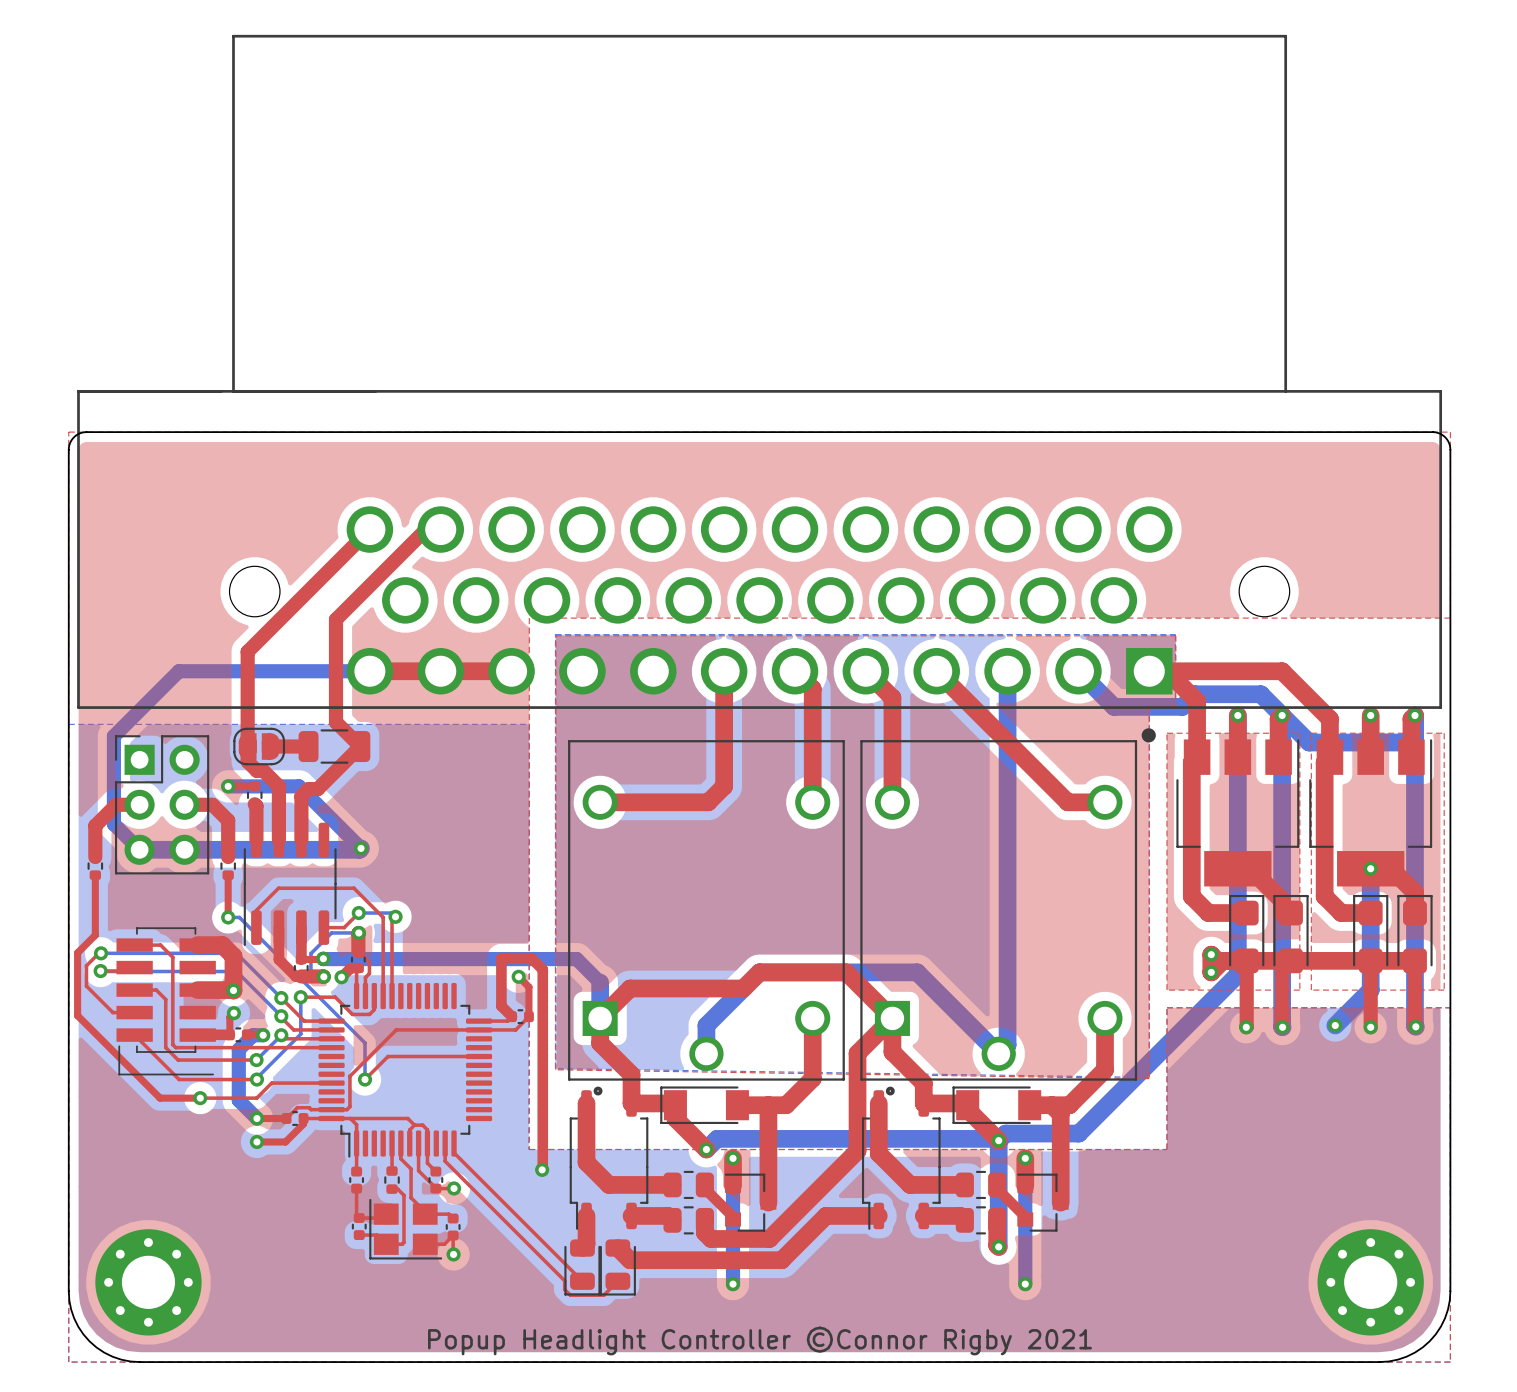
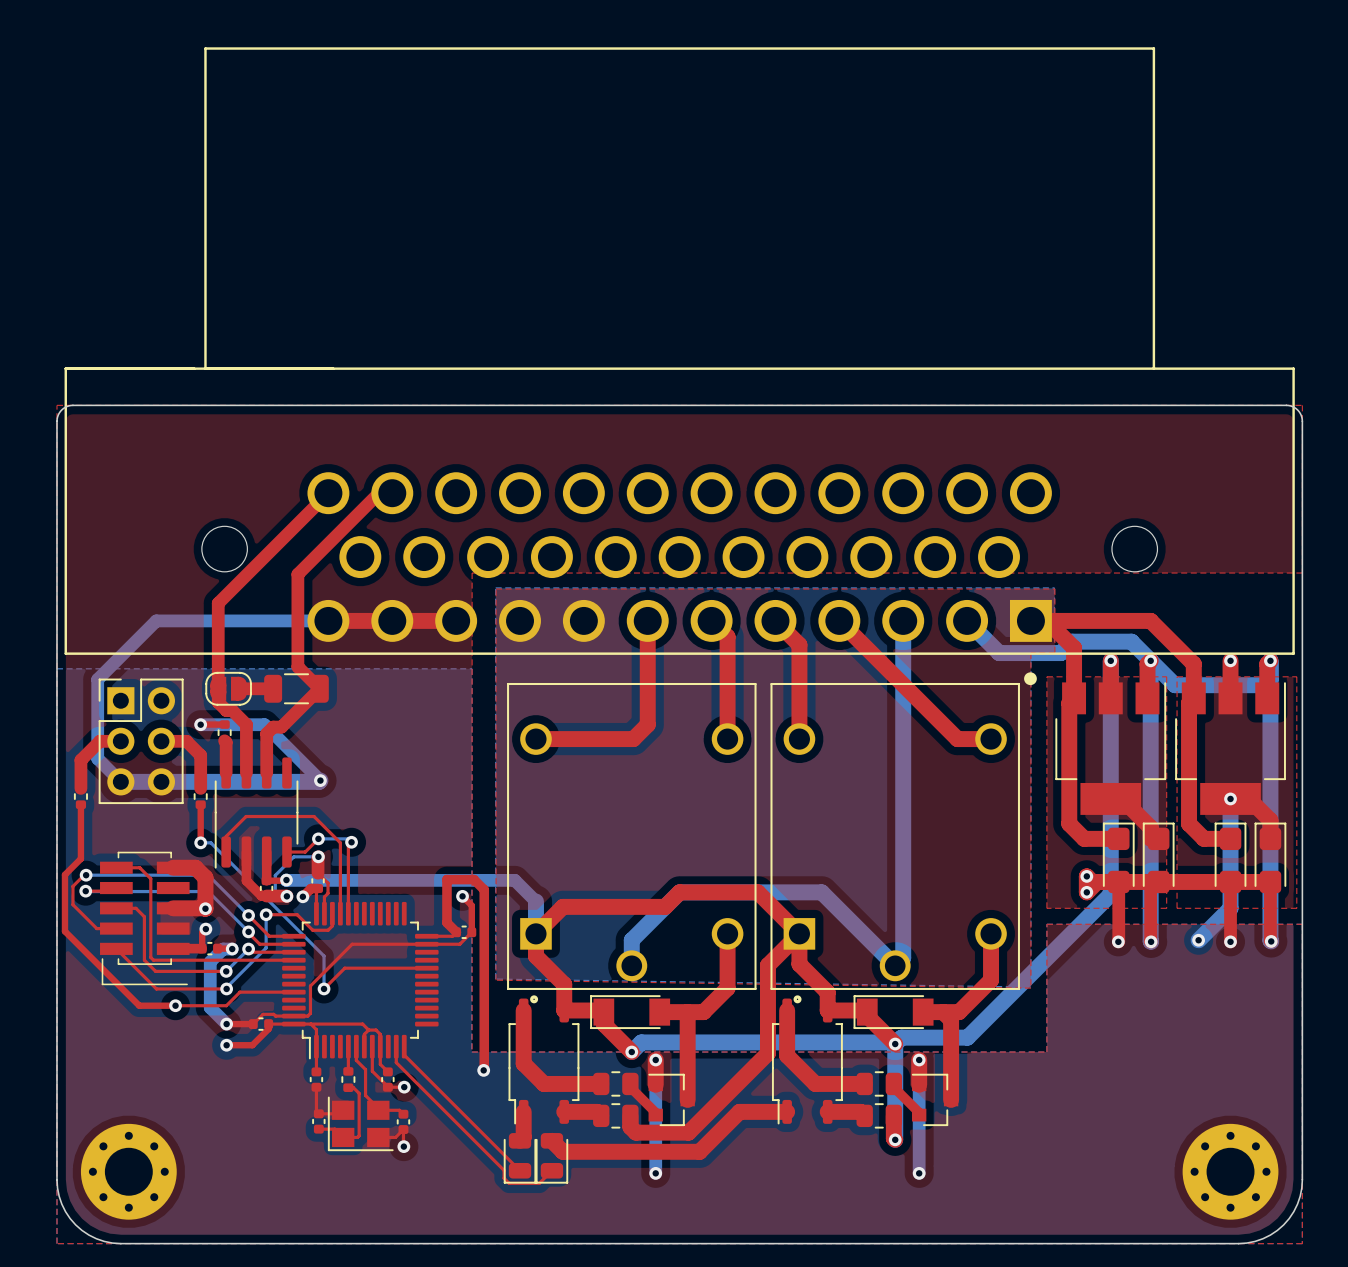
text: Popup Headlight Controller ©Connor Rigby 2021 (760, 1340) -> none

